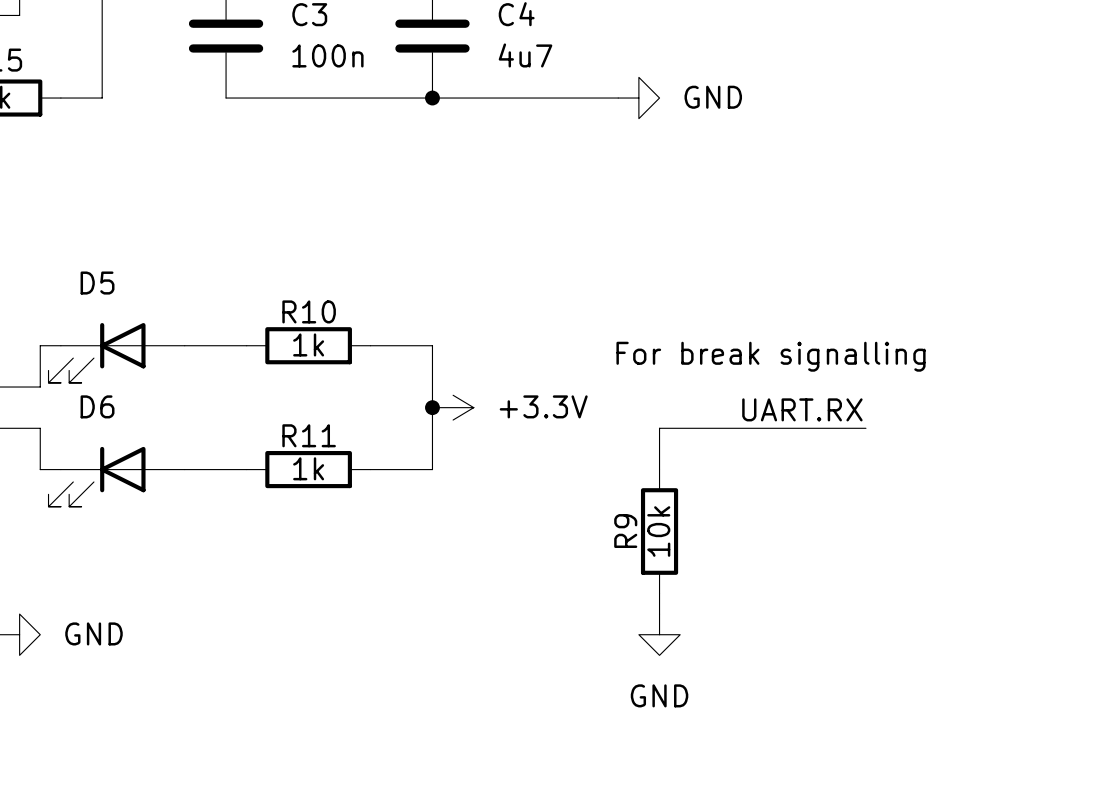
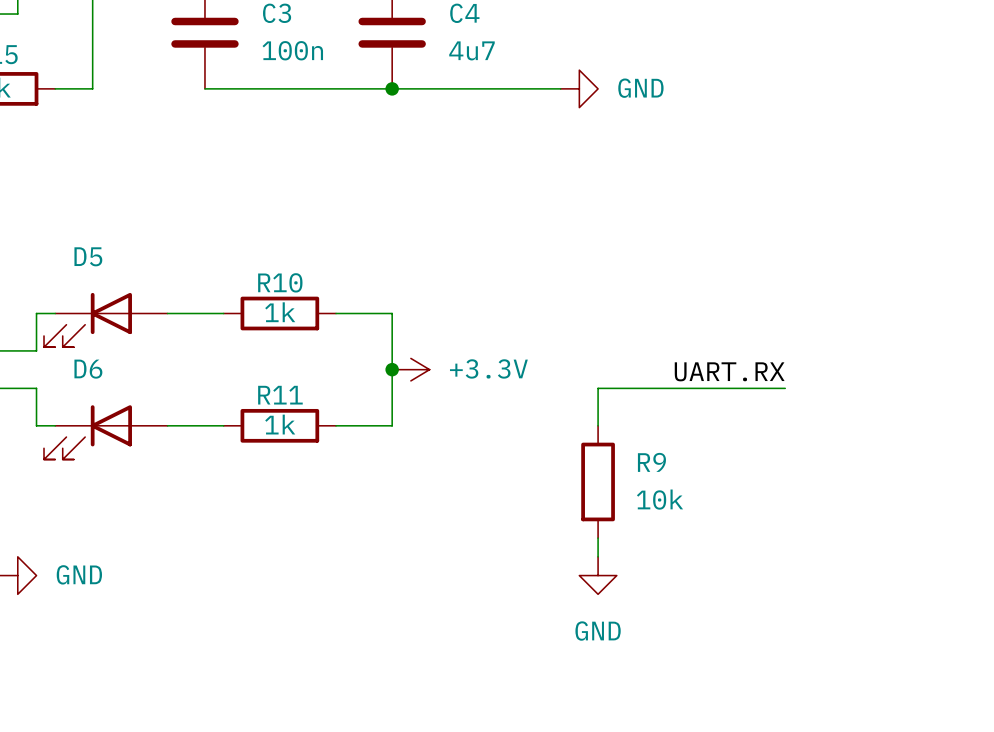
text: For break signalling (771, 356) -> none
R9 name rotation: 0° (625, 531) -> 90° clockwise (651, 462)
R9 name position: R9 (625, 531) -> R9 (651, 462)
R9 value rotation: 0° (658, 531) -> 90° clockwise (660, 499)
R9 value position: 10k (658, 531) -> 10k (660, 499)

